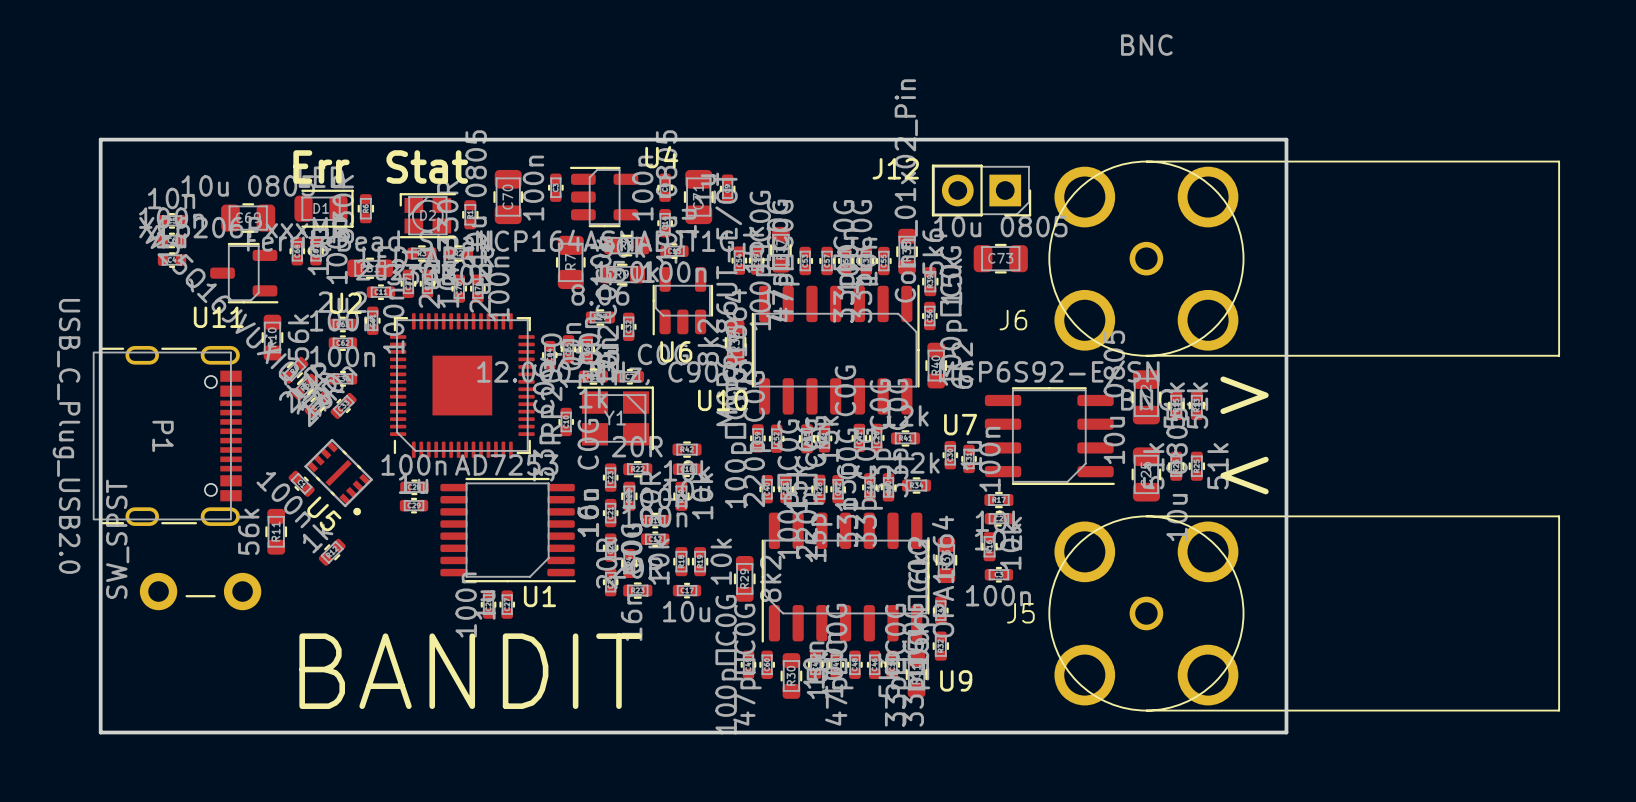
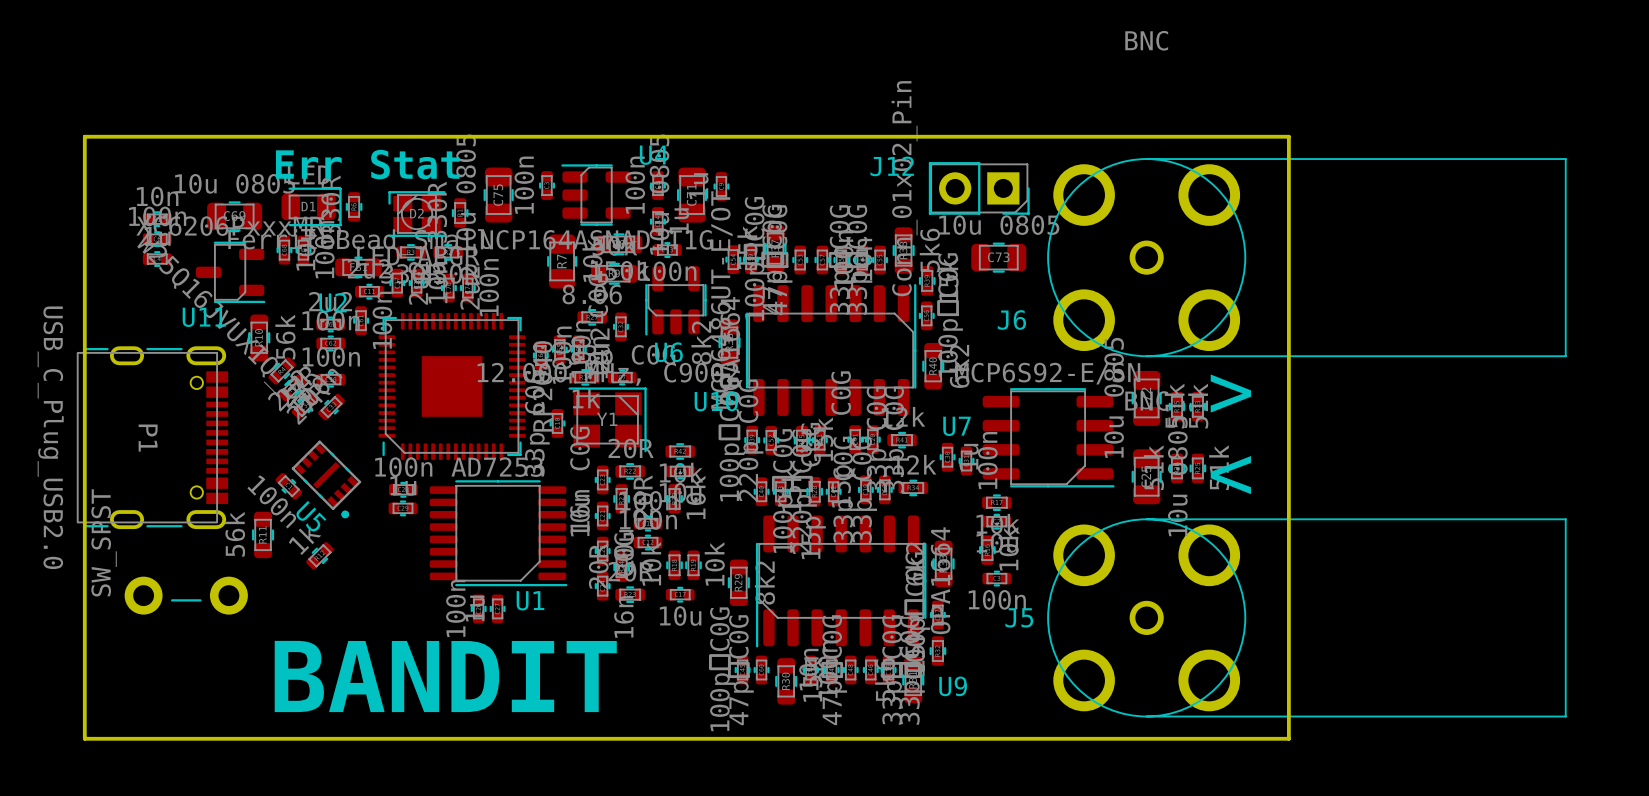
C70 name: C70 (507, 197) -> C75 (498, 195)

